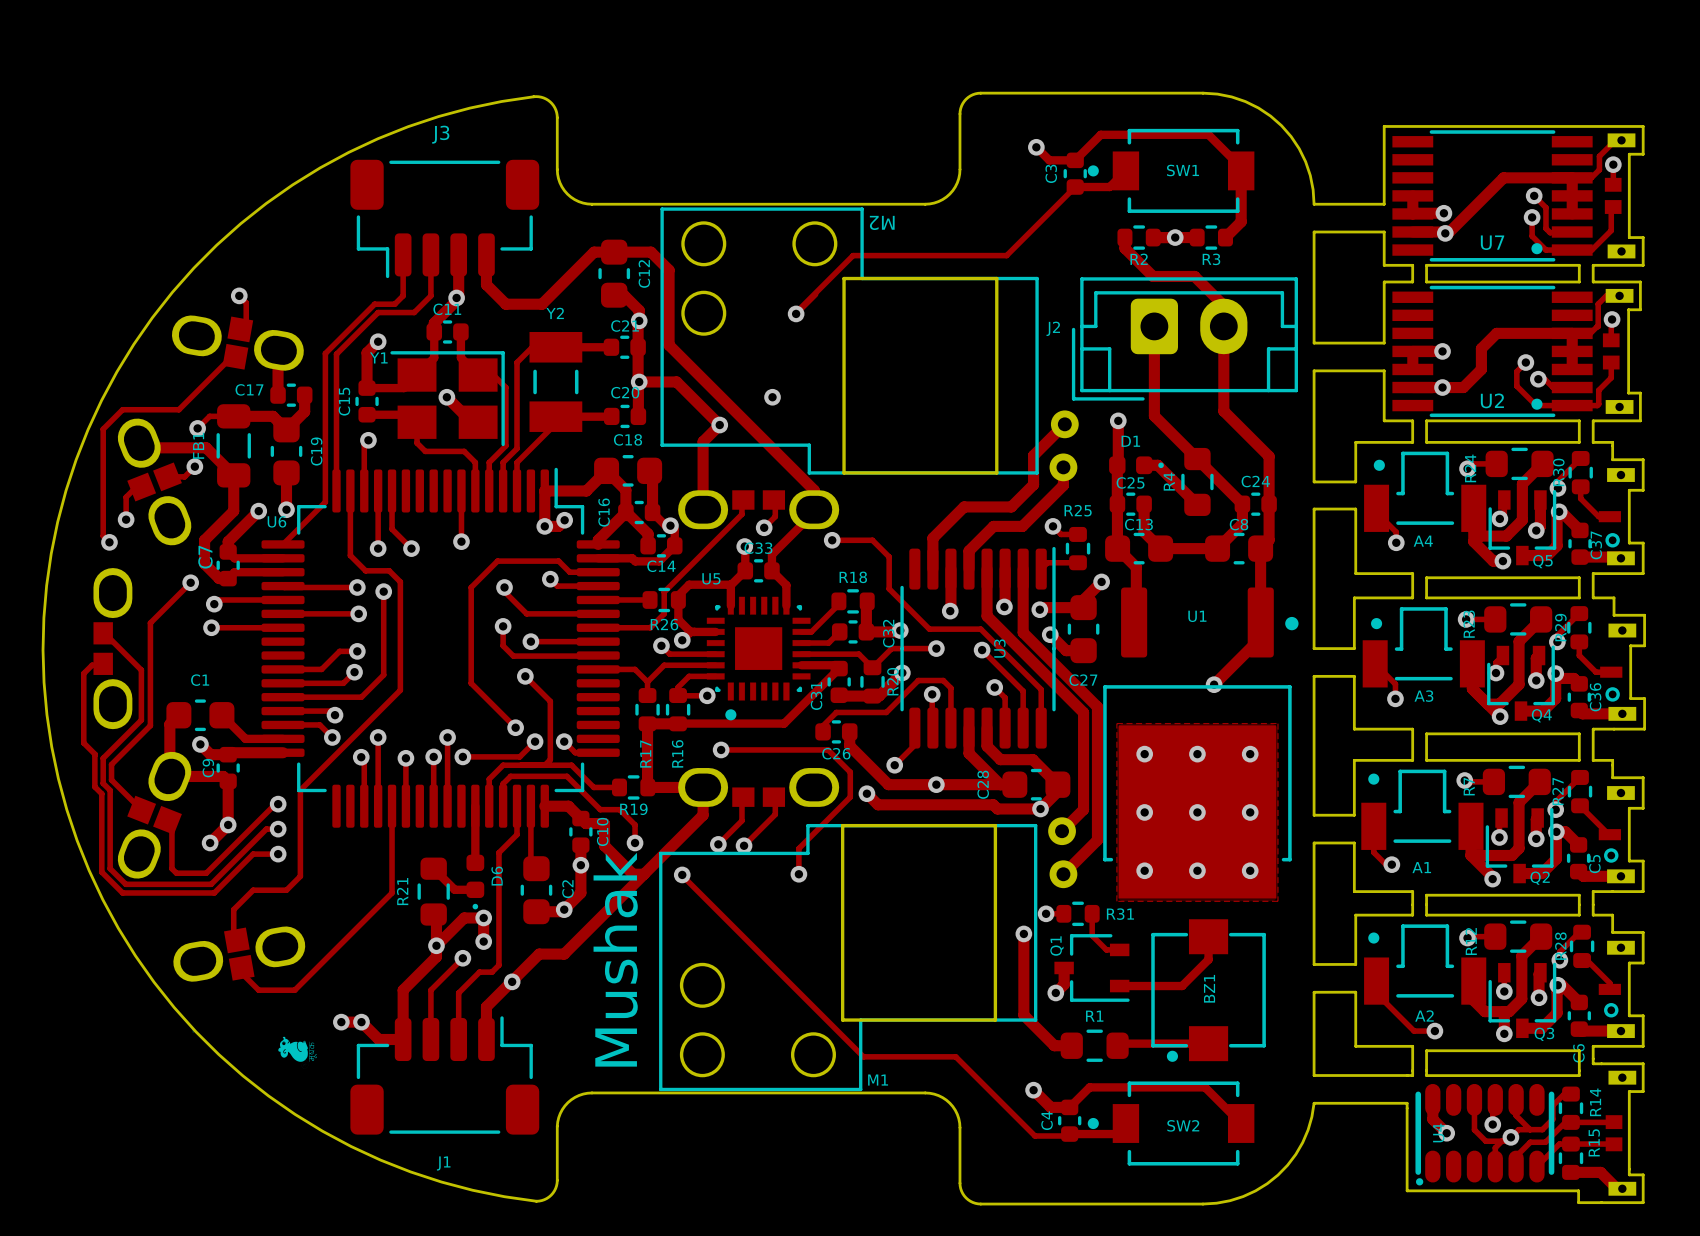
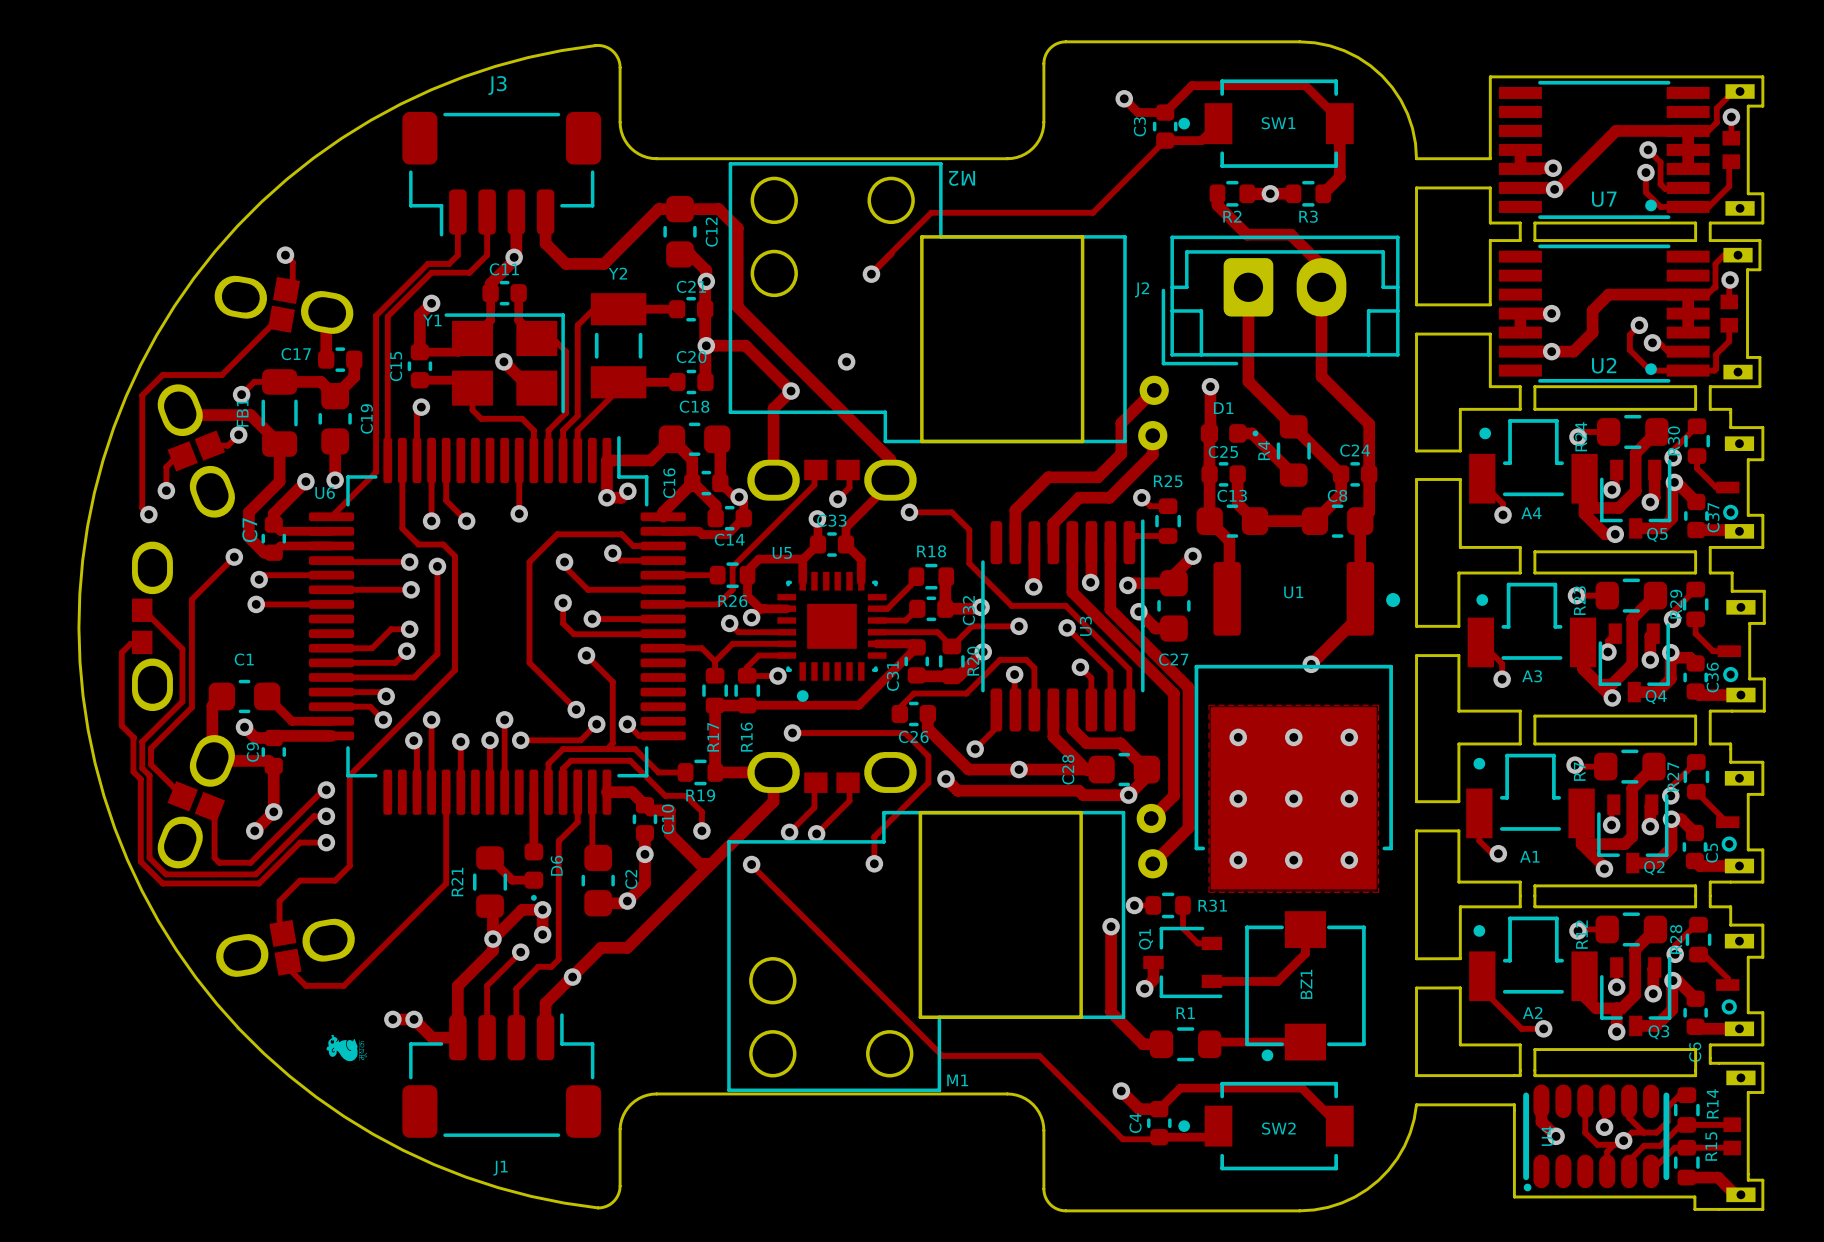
text: Mushak (615, 959) -> none

